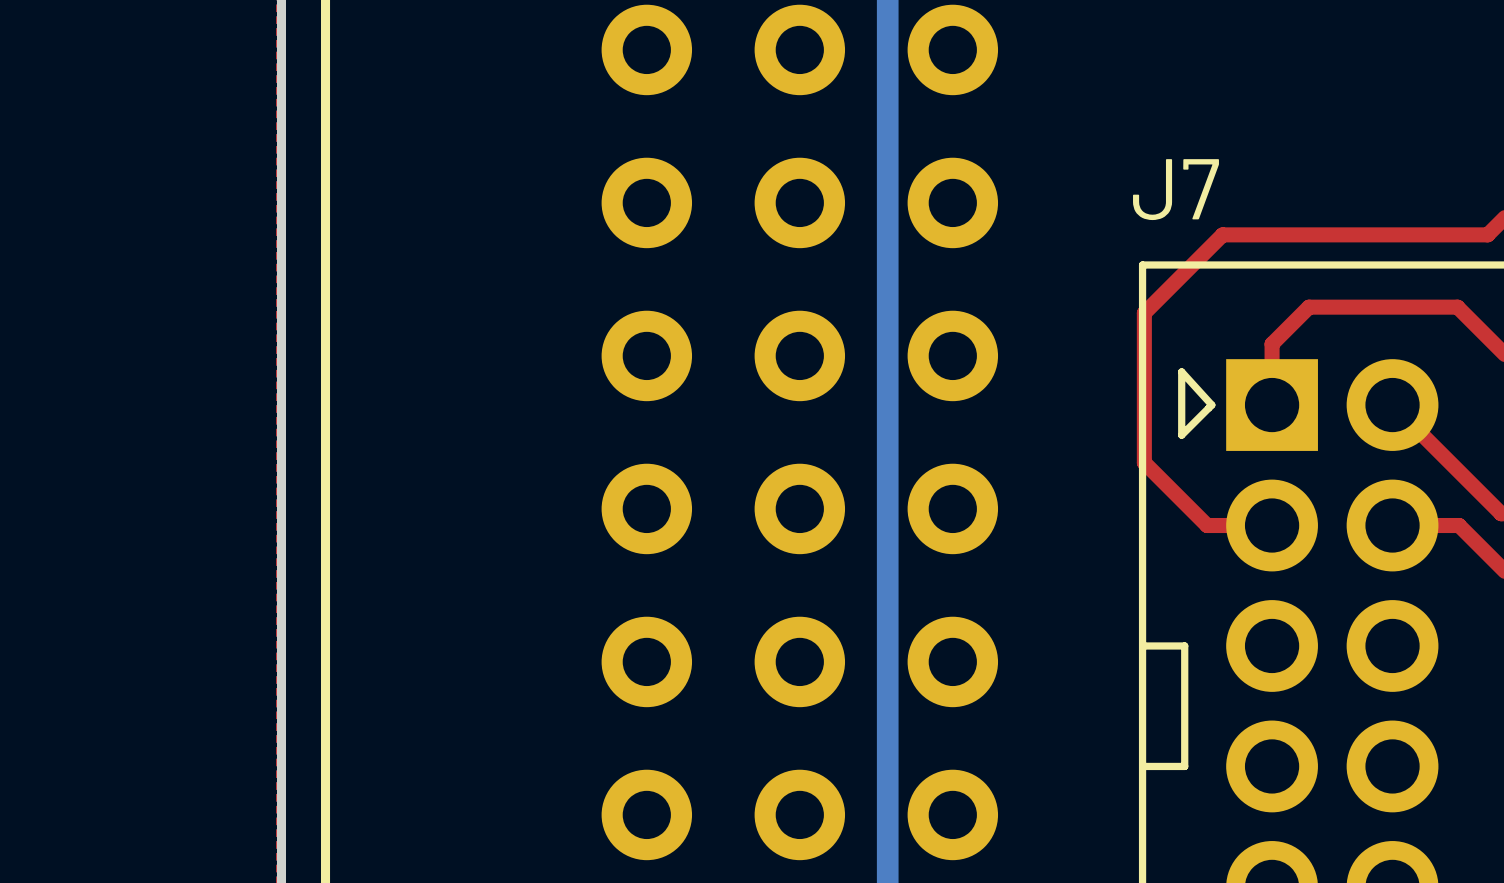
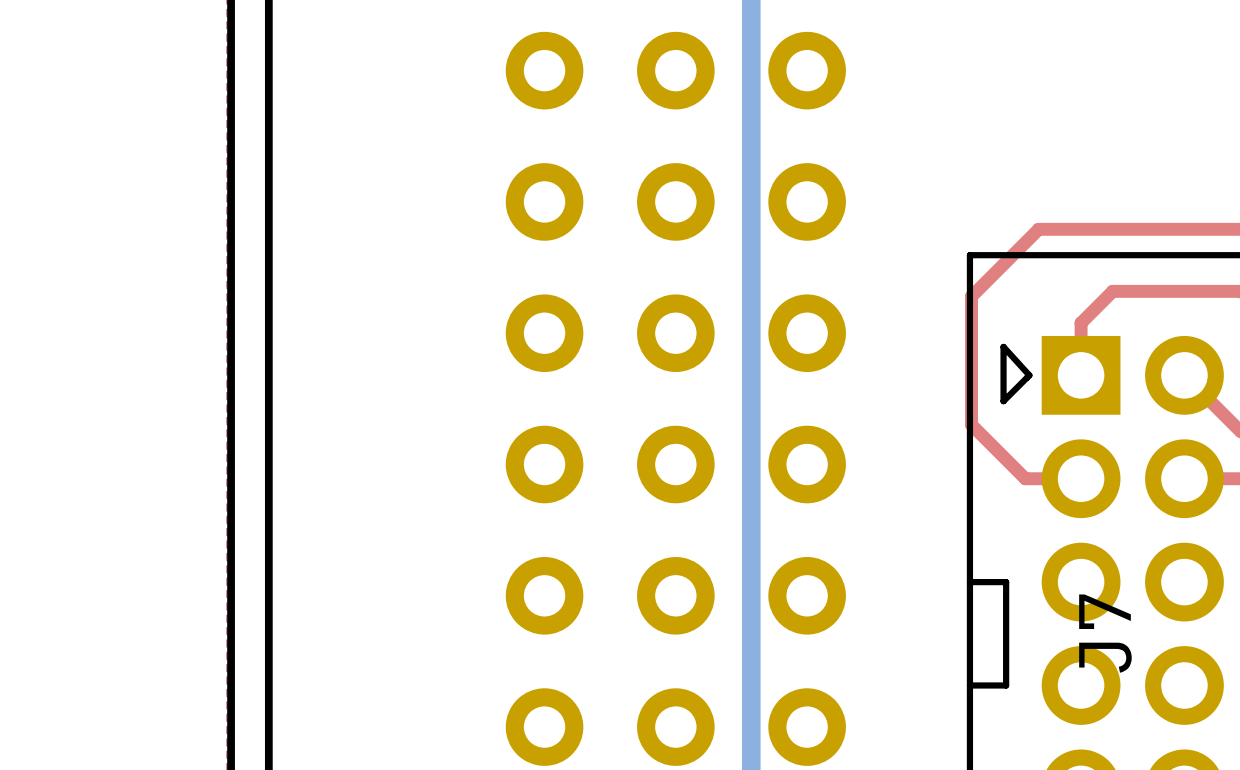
J7 name rotation: 0° (1175, 189) -> 90° counterclockwise (1105, 633)
J7 name position: J7 (1175, 189) -> J7 (1105, 633)

